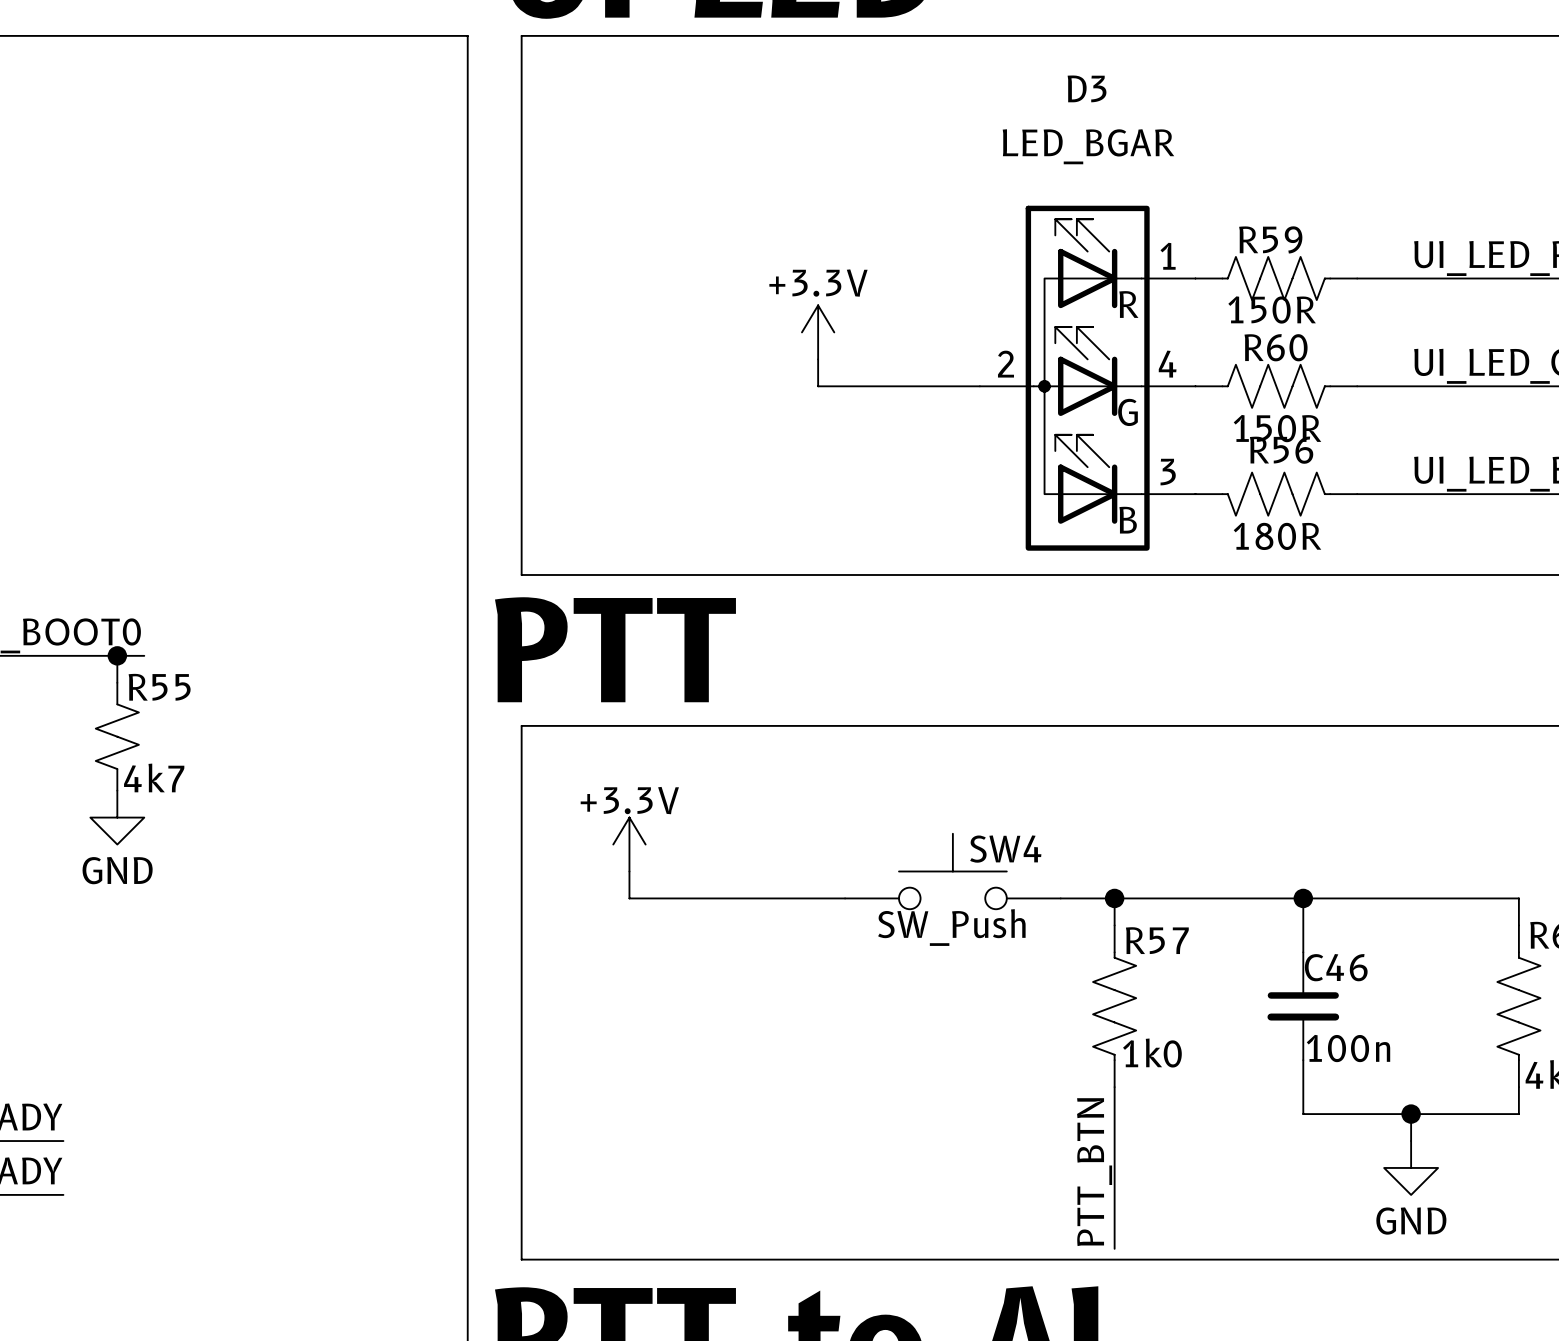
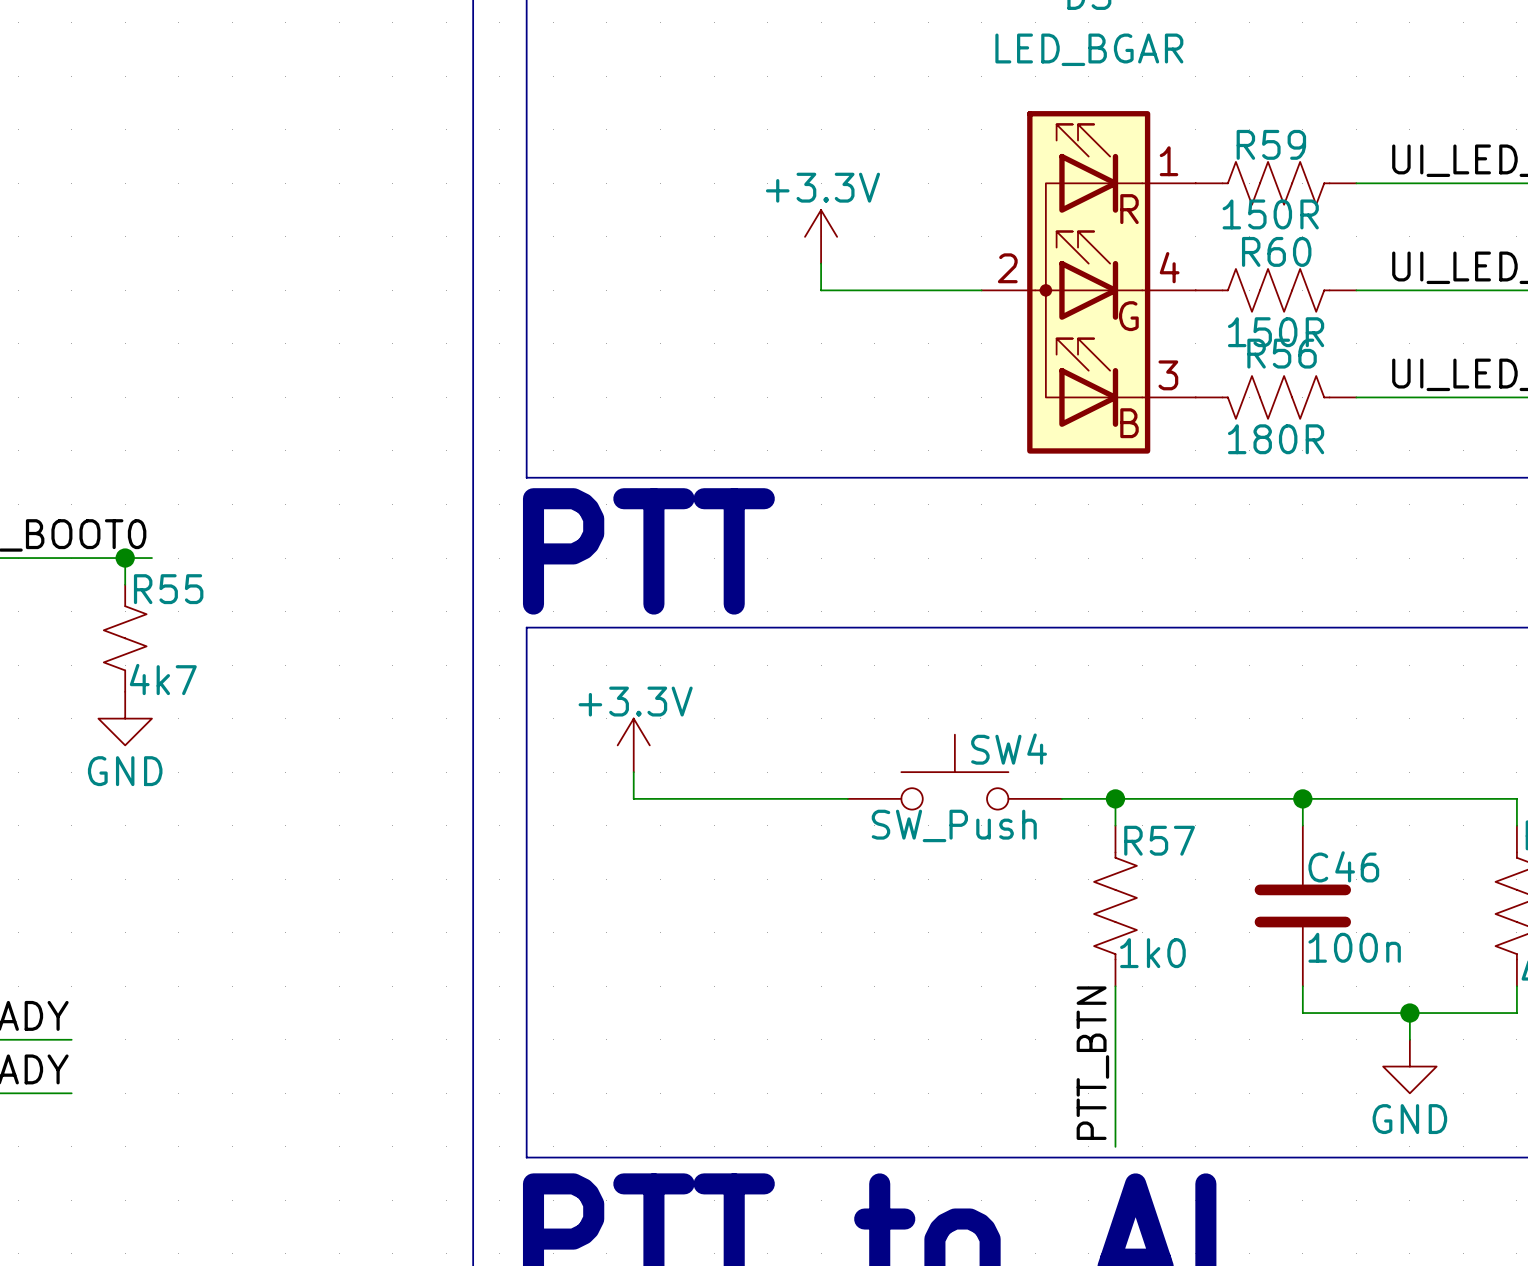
C46 symbol: [1267, 952, 1340, 1061] -> [1254, 825, 1352, 987]

